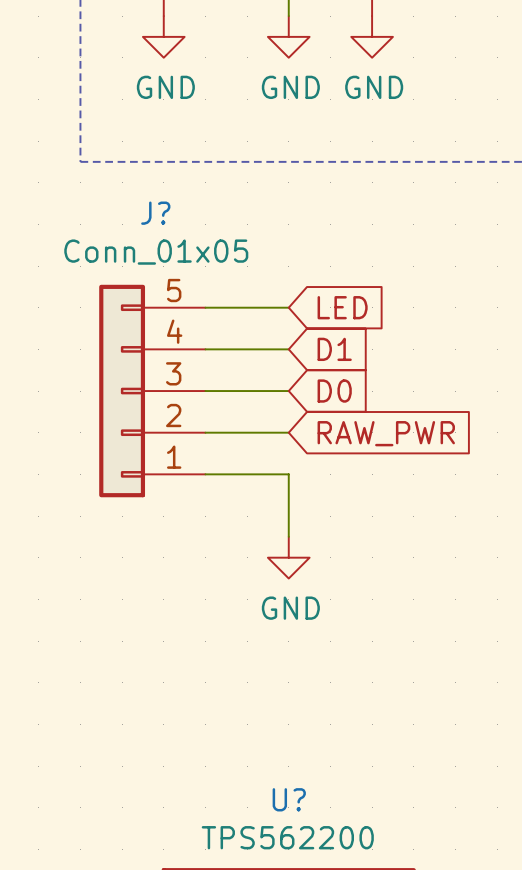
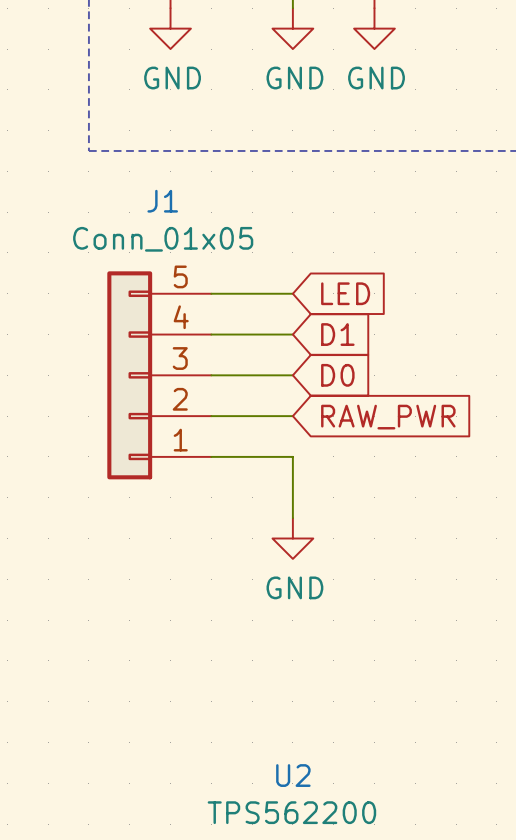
J? name: J? (155, 213) -> J1 (162, 201)
U? name: U? (289, 799) -> U2 (293, 775)

